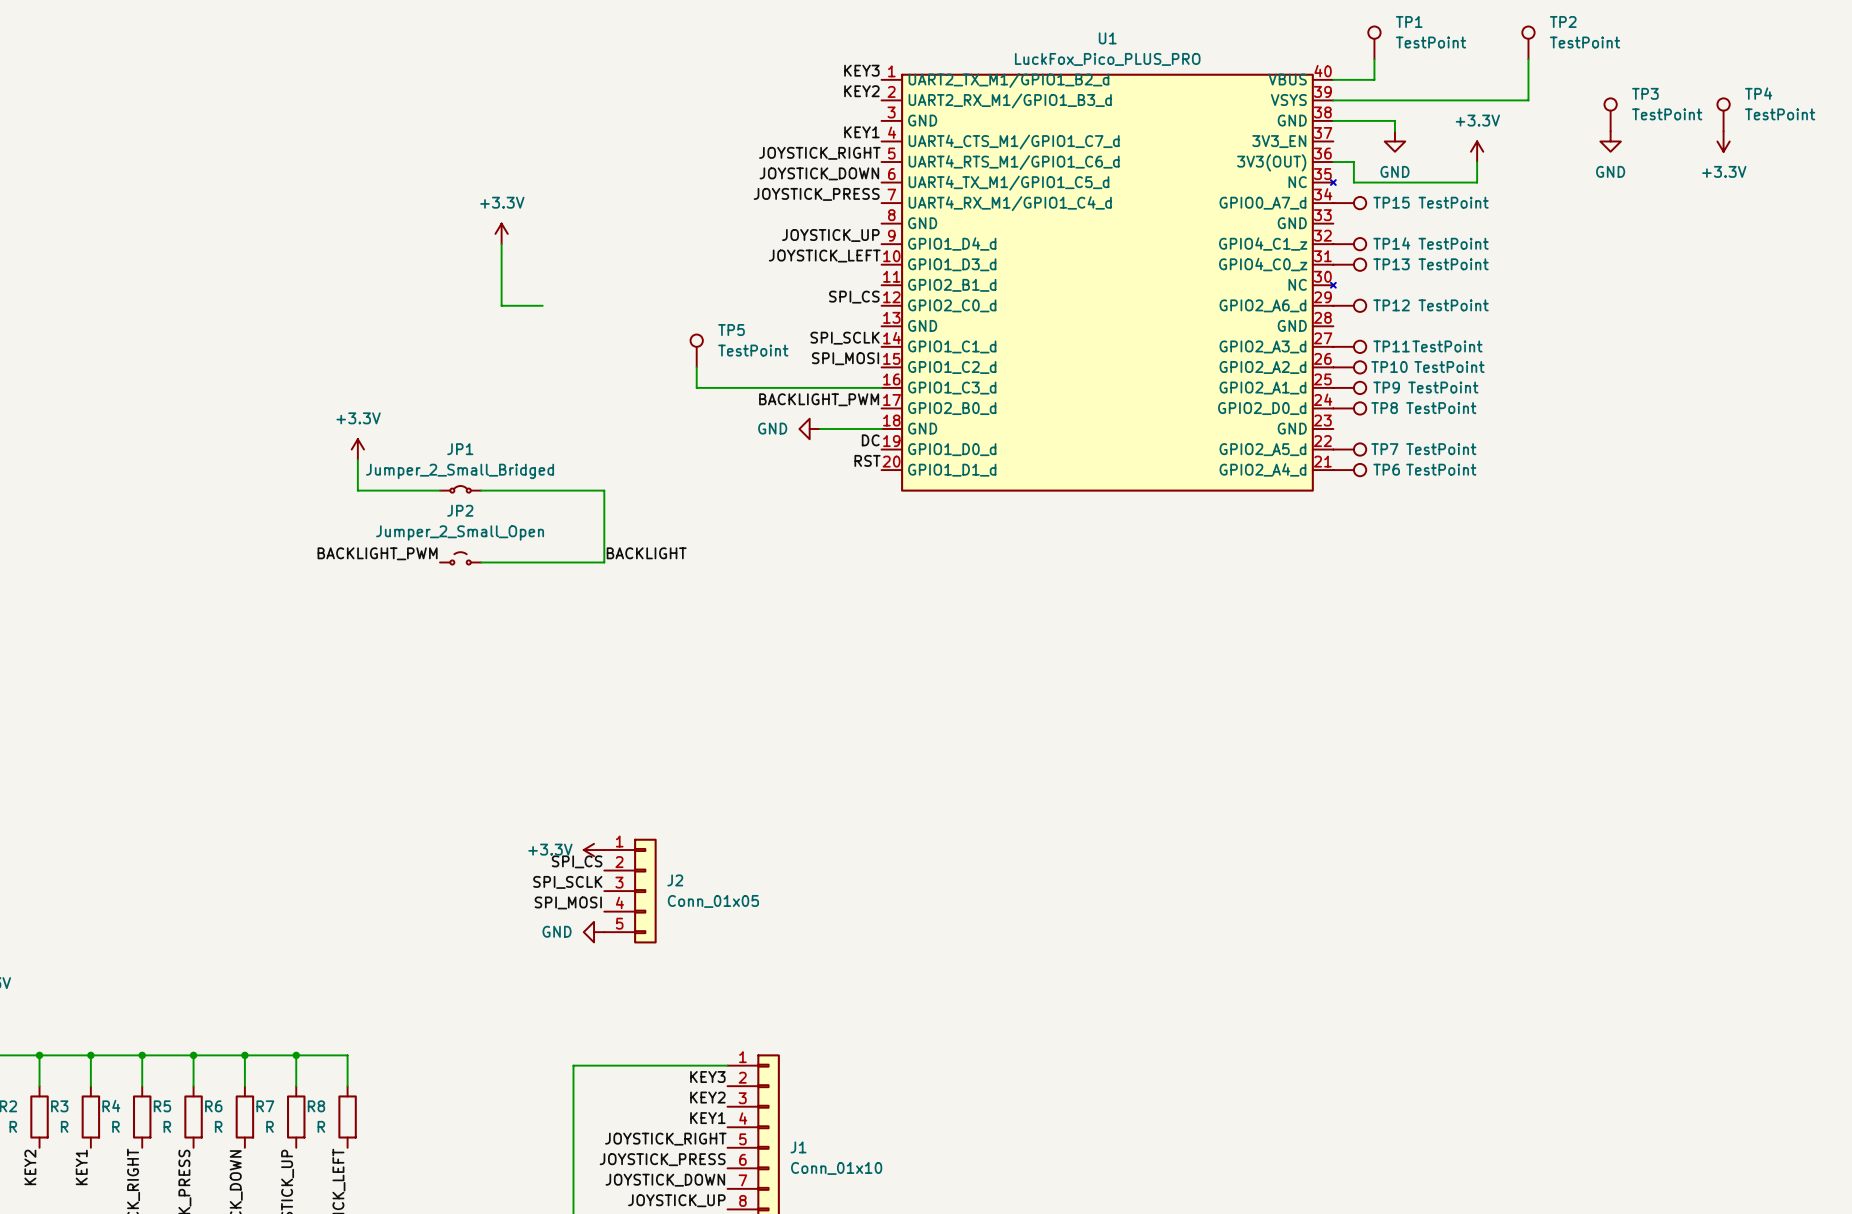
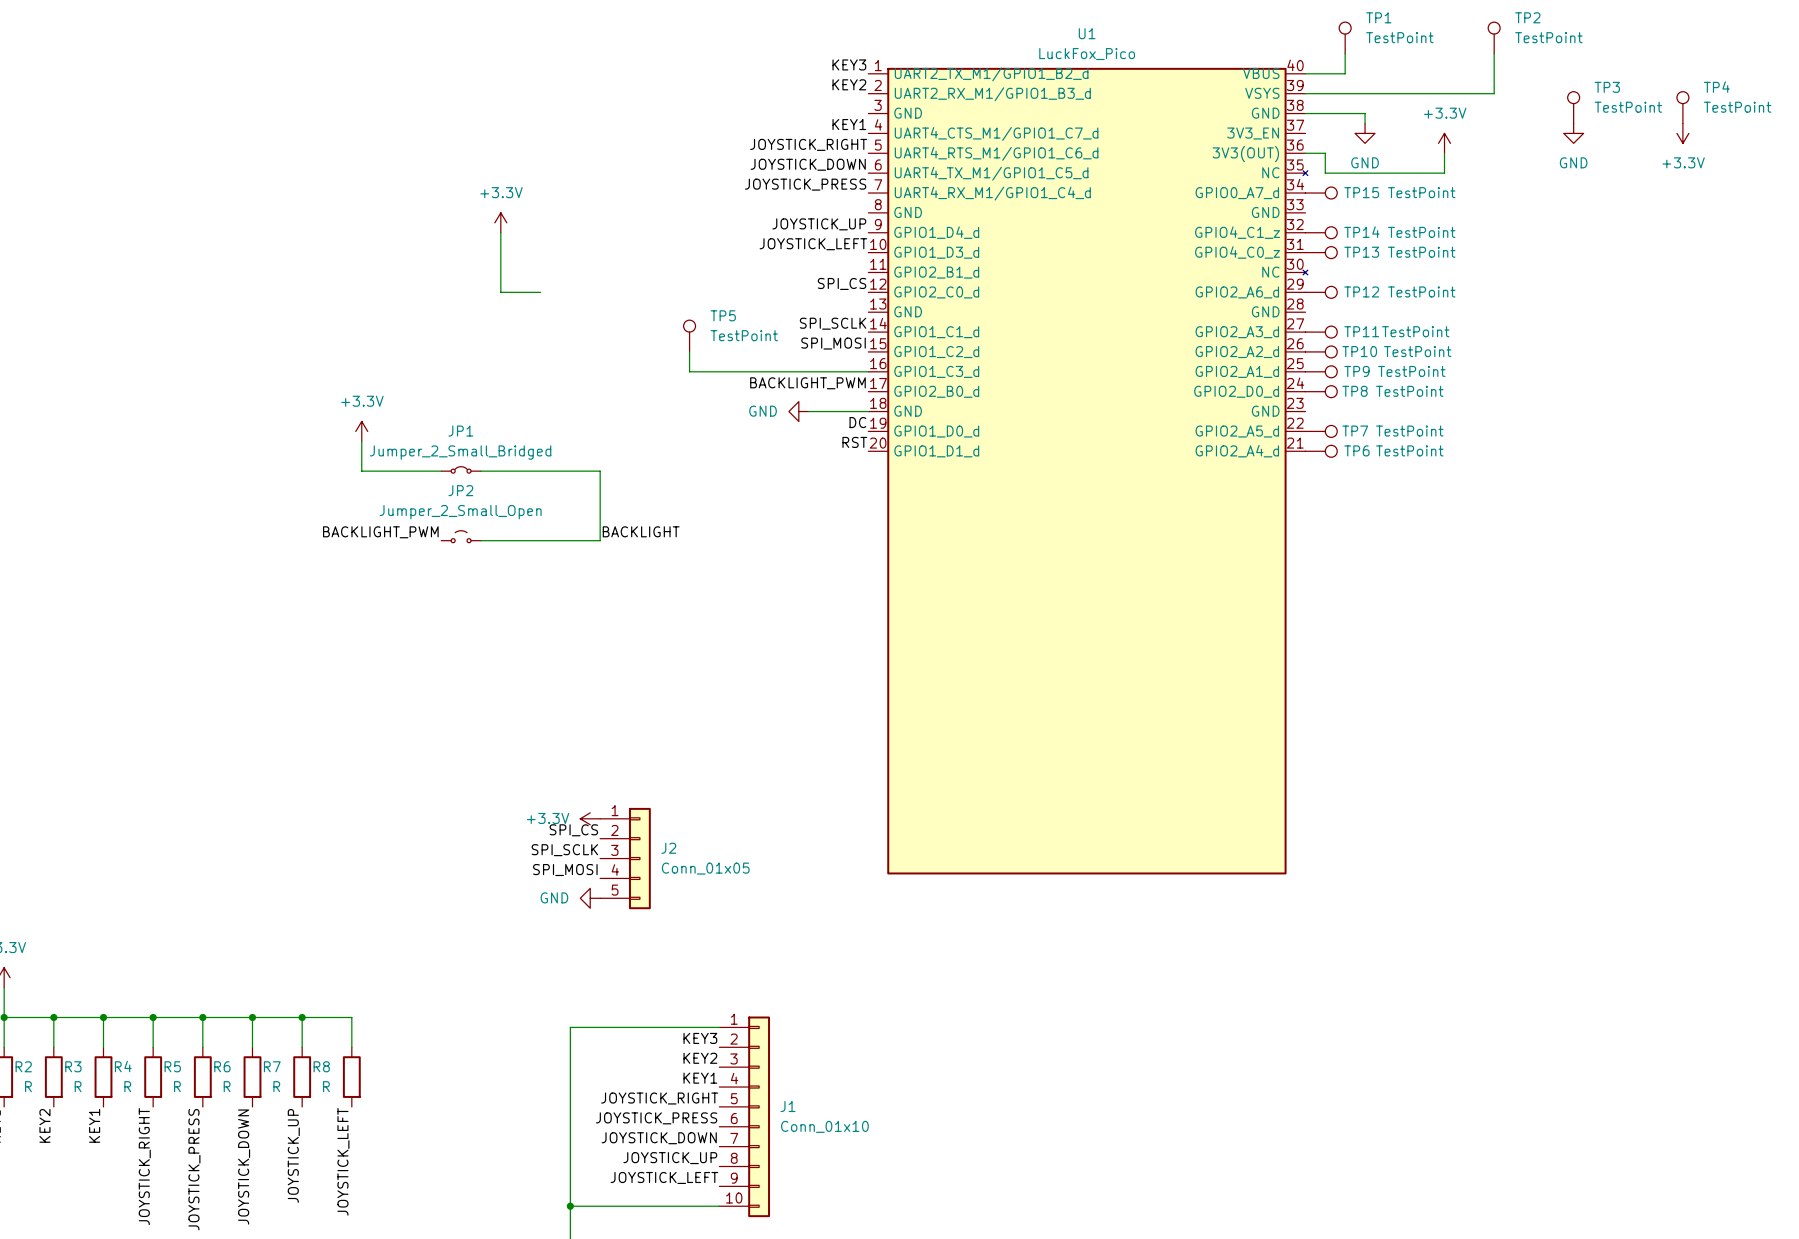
U1 value: LuckFox_Pico_PLUS_PRO (1107, 59) -> LuckFox_Pico (1087, 54)
U1 symbol: [881, 73, 1336, 492] -> [868, 67, 1308, 875]

